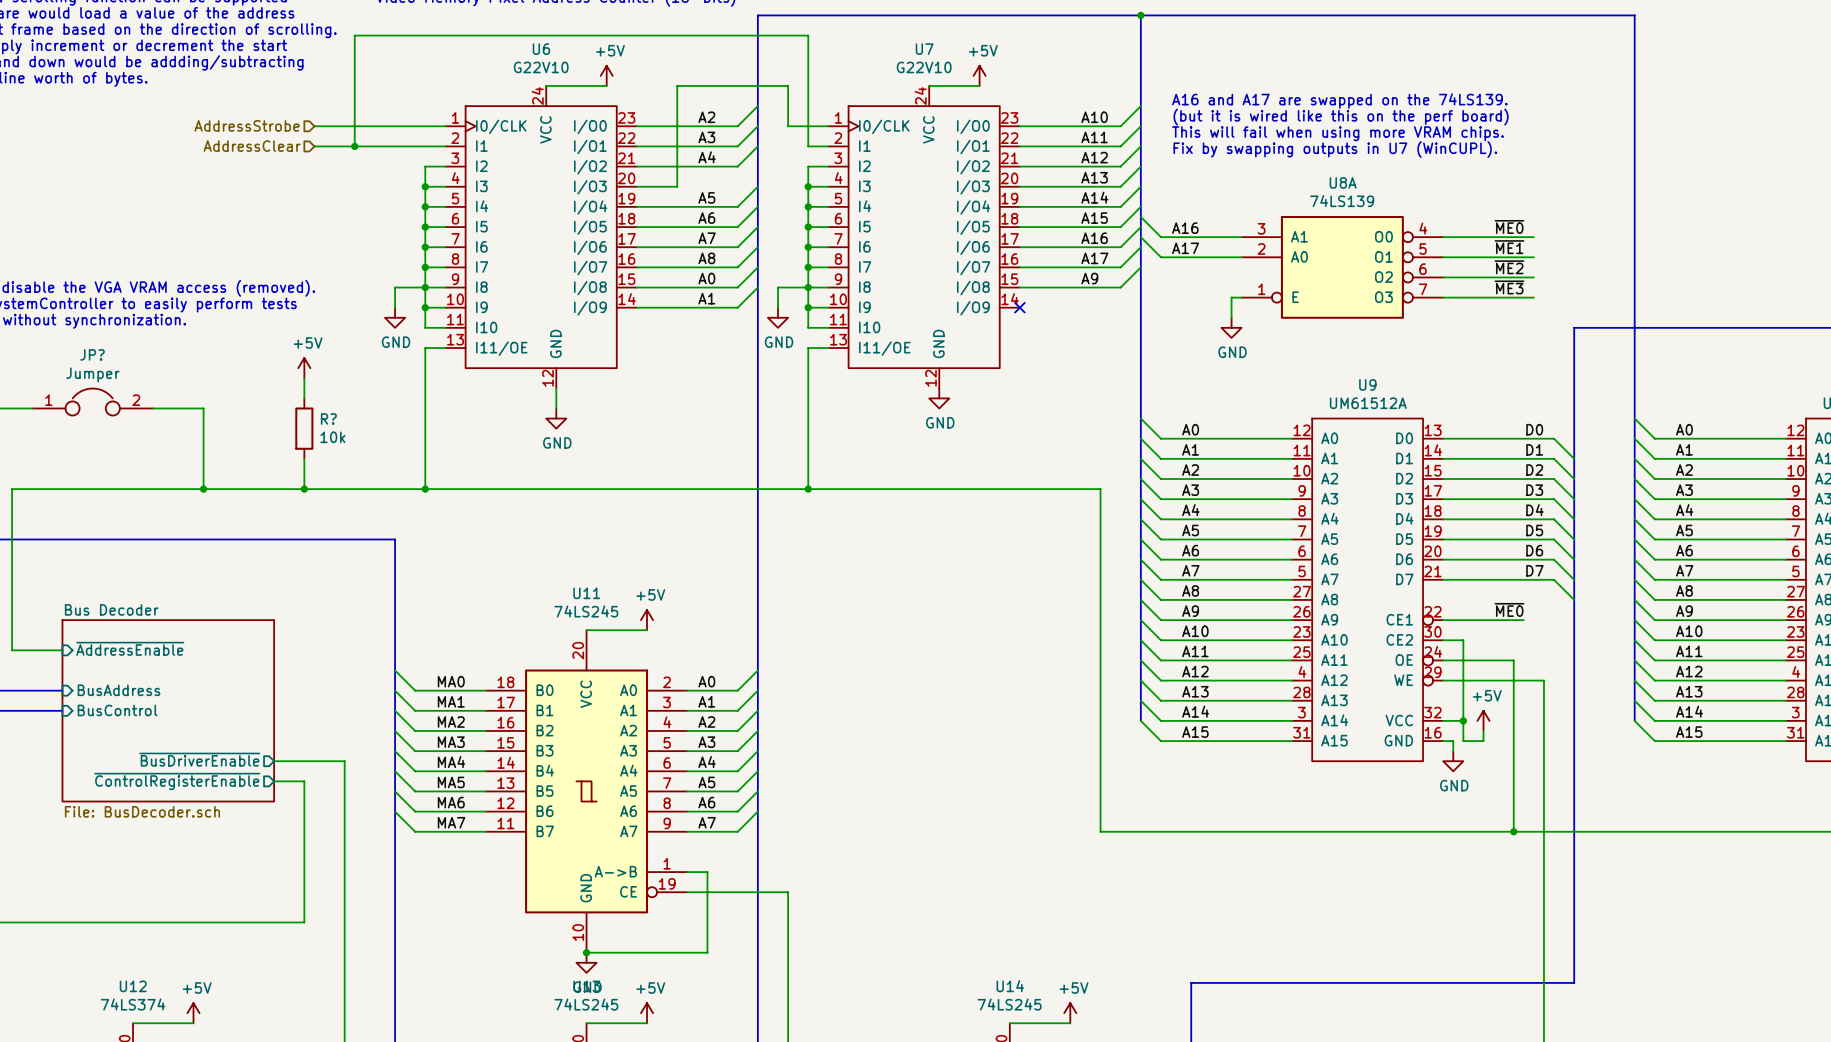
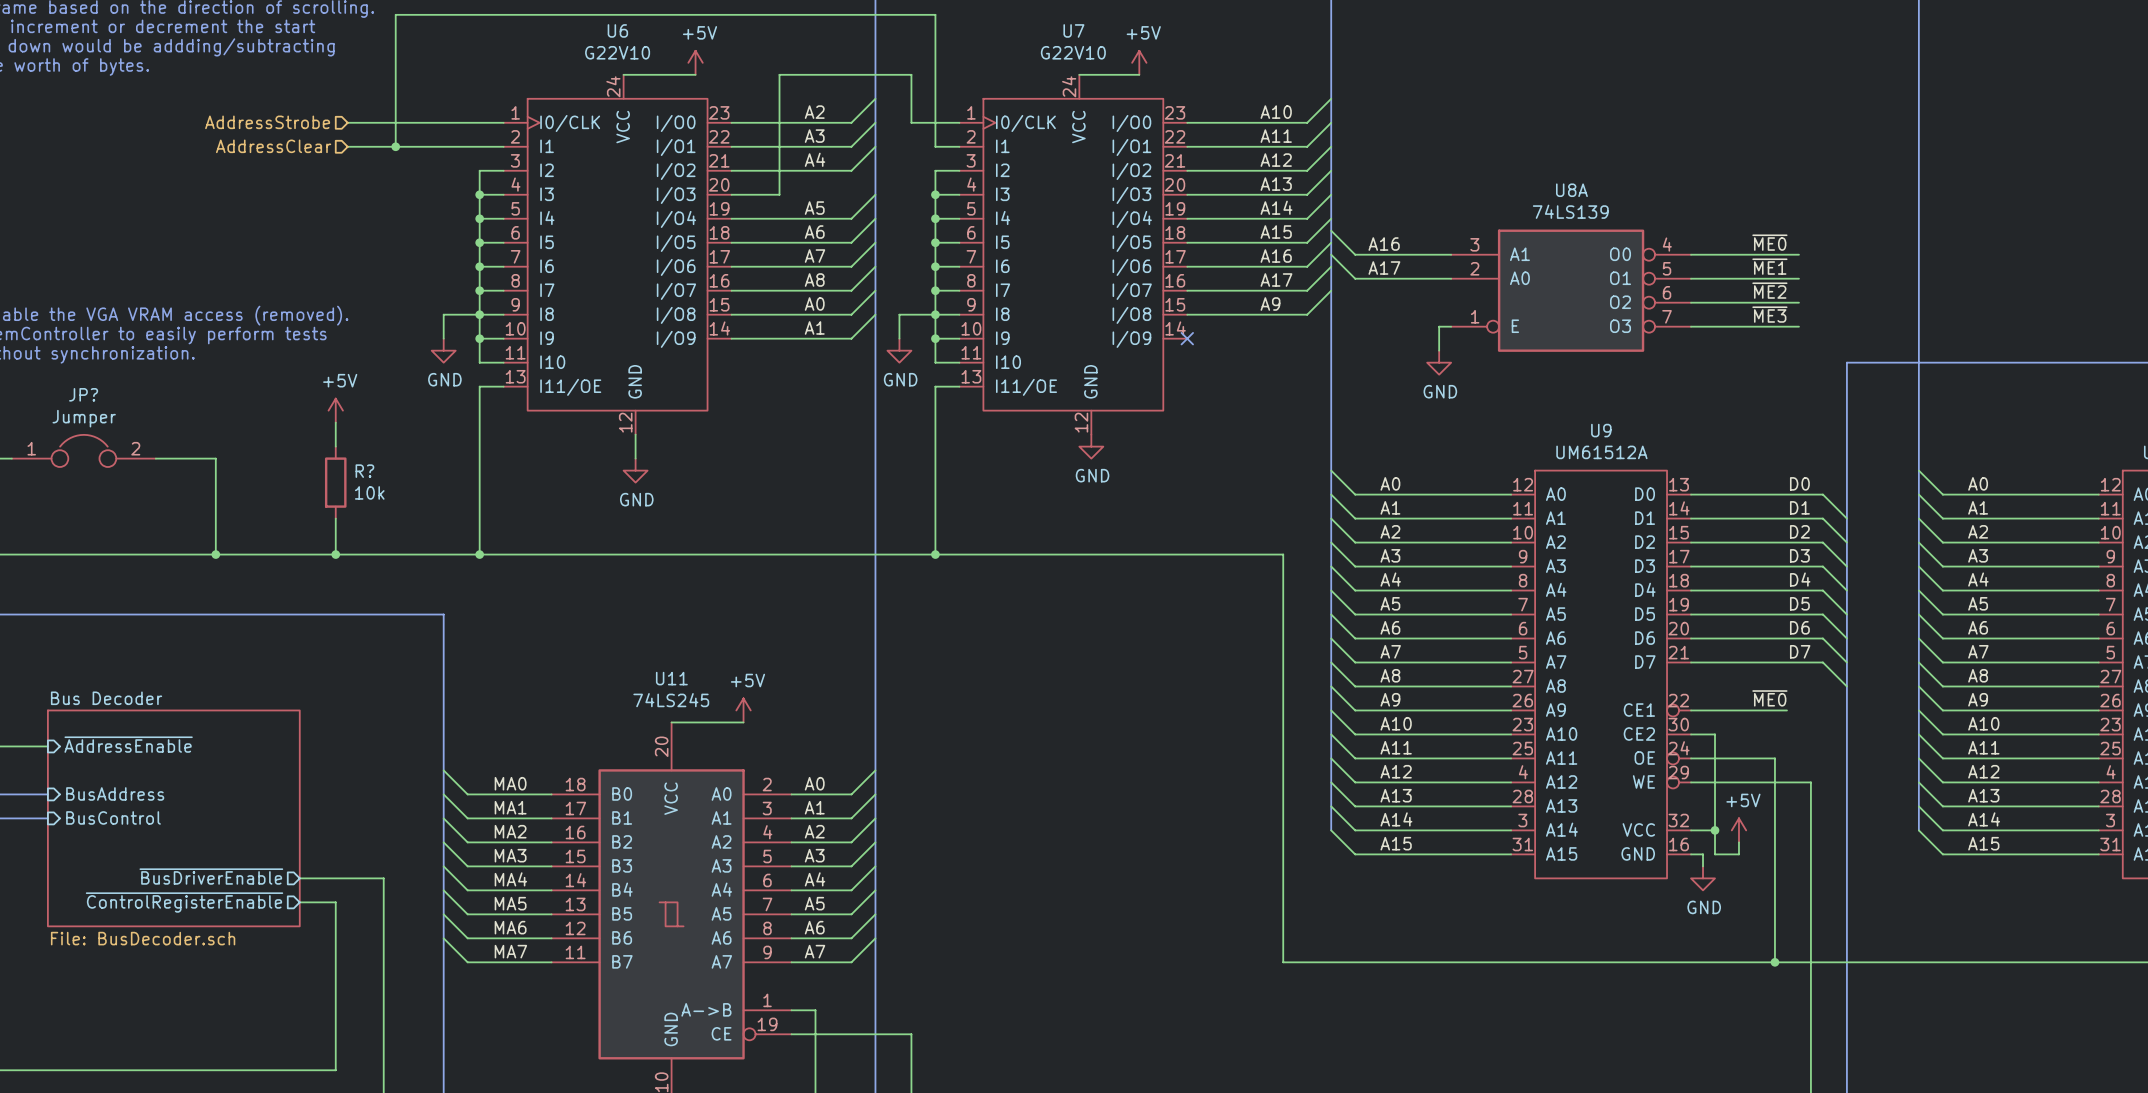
text: A16 and A17 are swapped on the 74LS139. (1339, 101) -> none
text: (but it is wired like this on the perf board) (1341, 117) -> none
text: This will fail when using more VRAM chips. (1337, 133) -> none
text: Fix by swapping outputs in U7 (WinCUPL). (1335, 149) -> none

